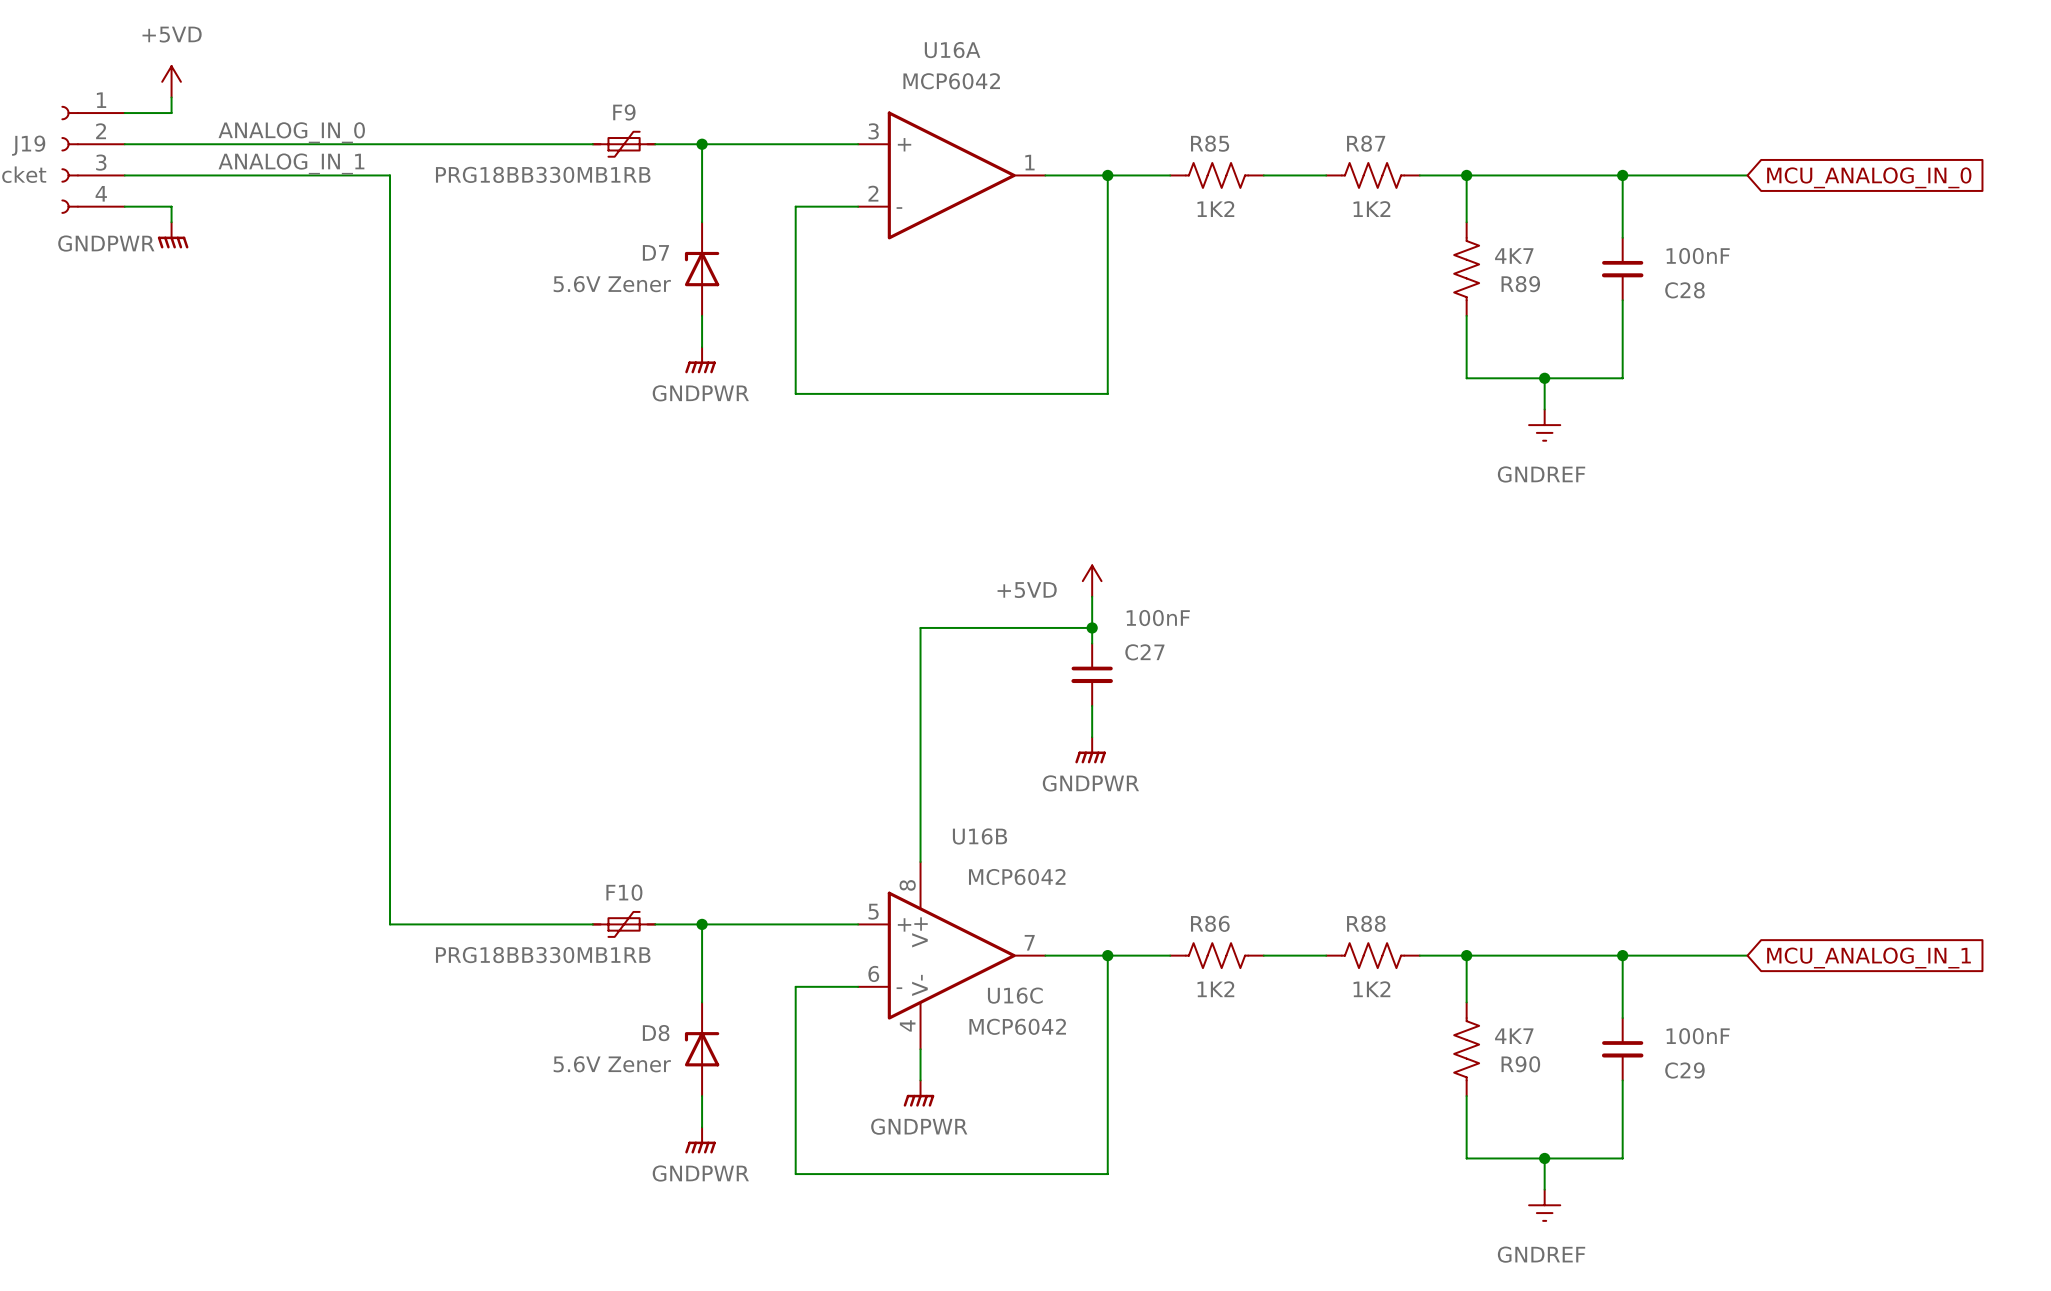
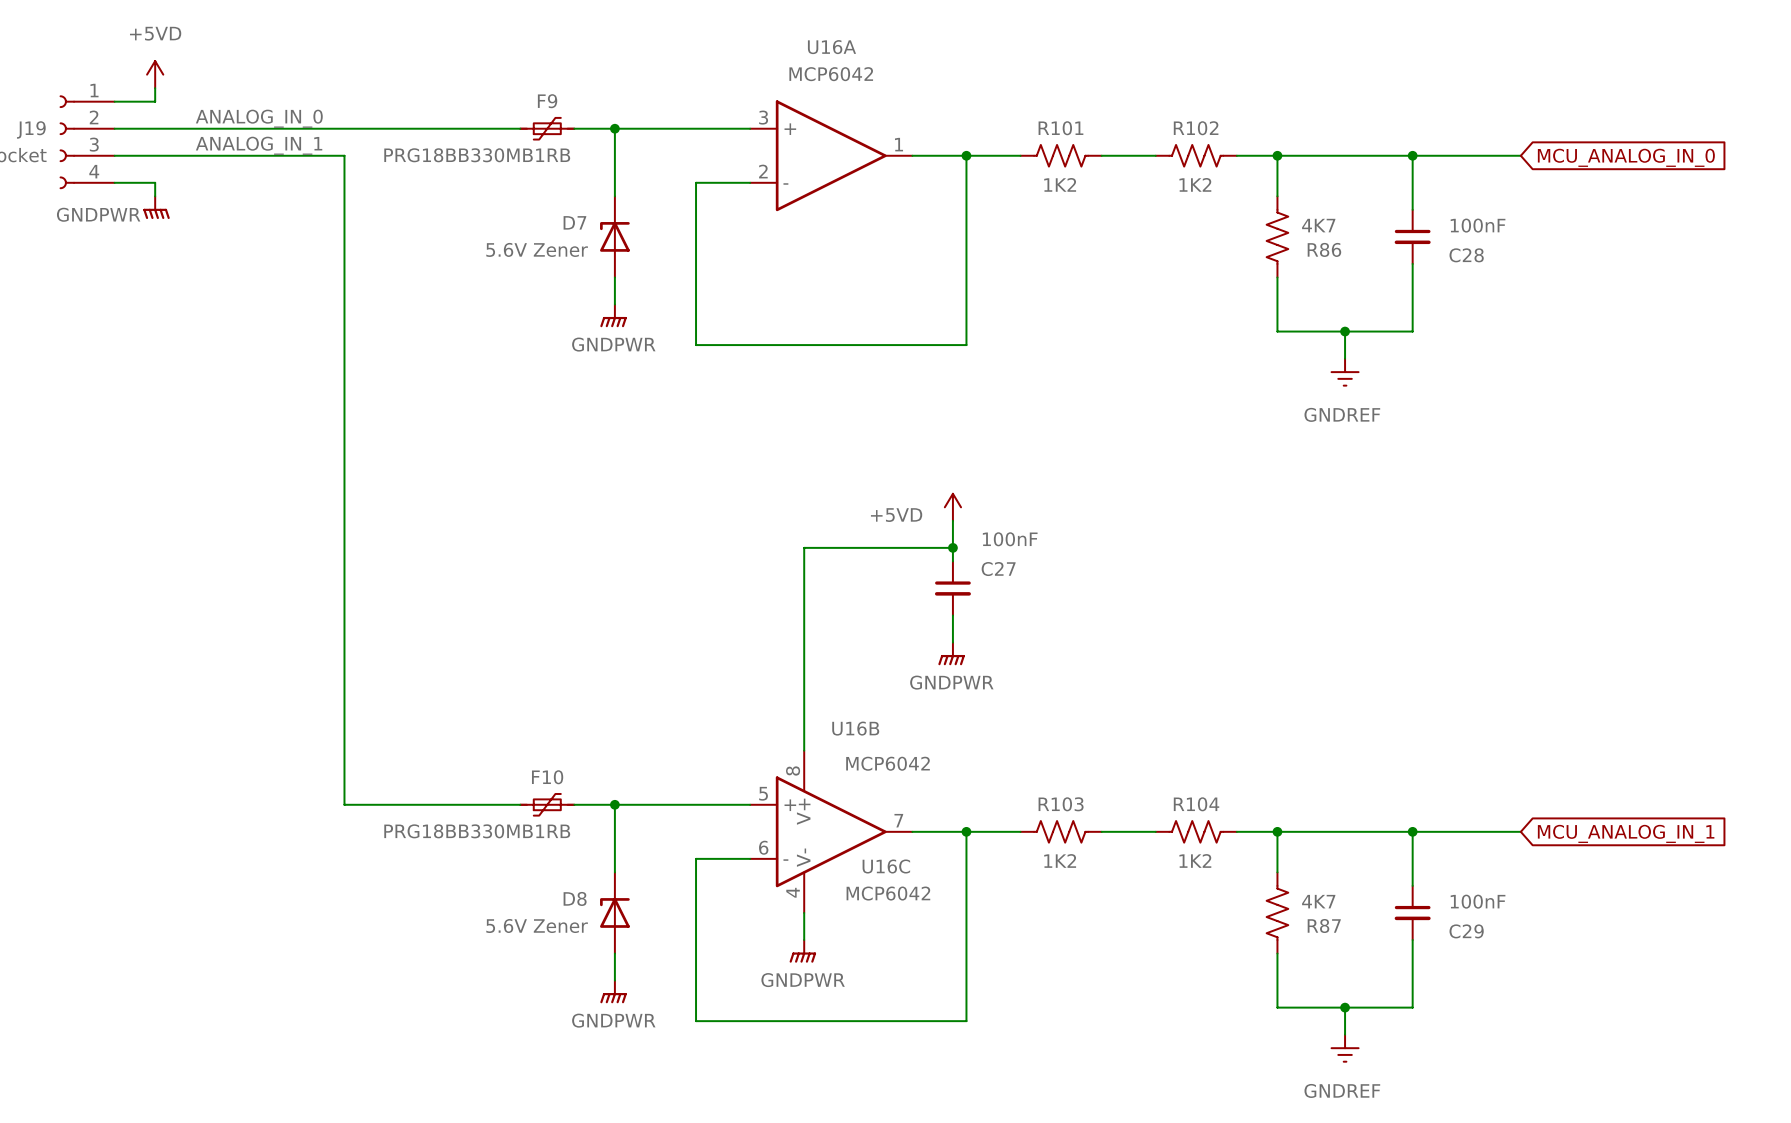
R85 name: R85 (1210, 143) -> R101 (1060, 128)
R87 name: R87 (1366, 143) -> R102 (1196, 128)
R89 name: R89 (1520, 284) -> R86 (1324, 249)
R86 name: R86 (1210, 923) -> R103 (1061, 804)
R88 name: R88 (1366, 923) -> R104 (1196, 804)
R90 name: R90 (1520, 1064) -> R87 (1324, 925)

